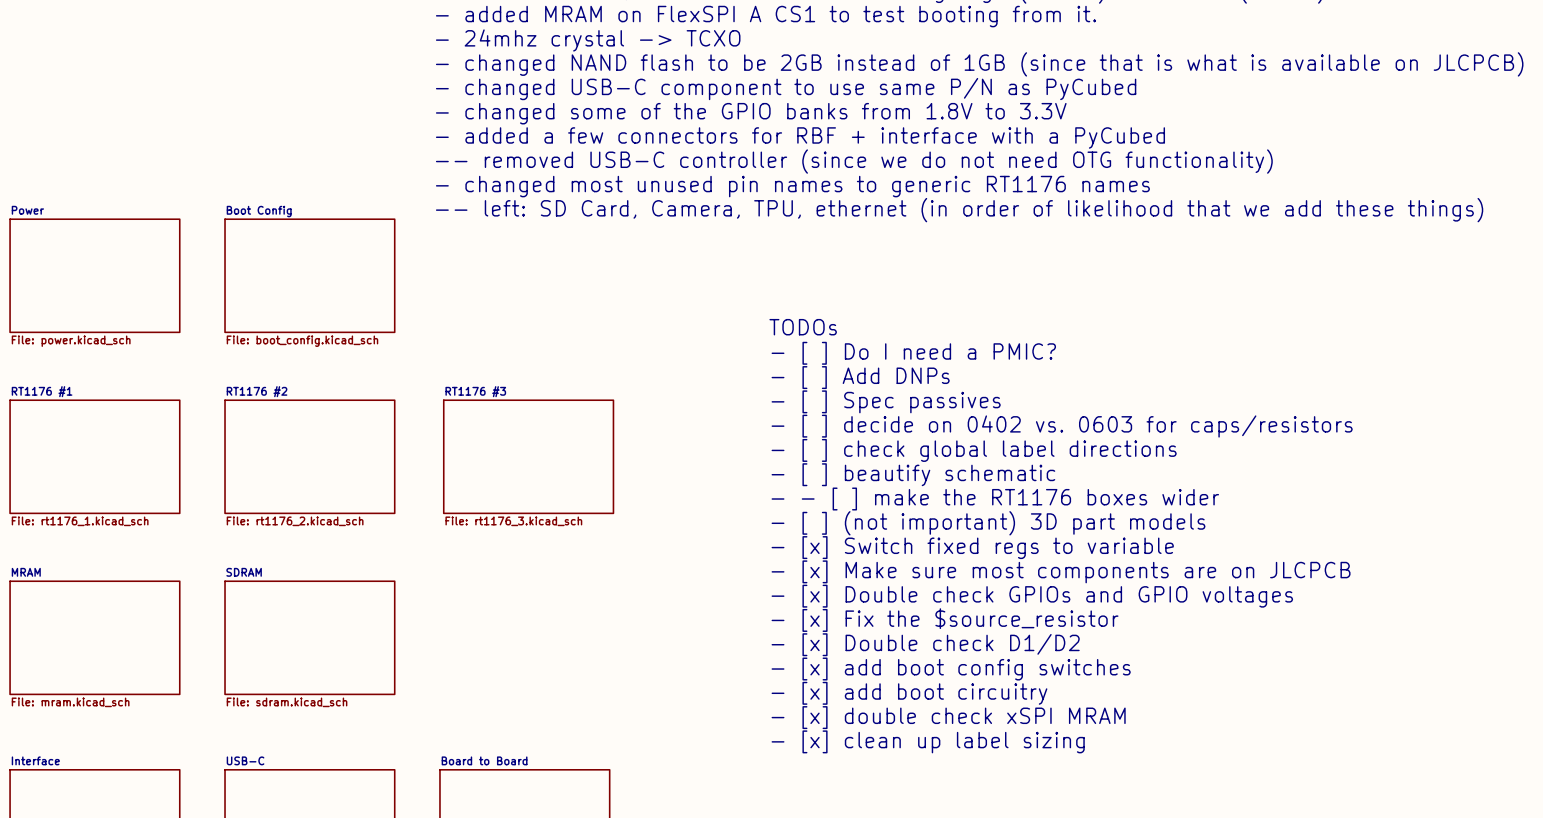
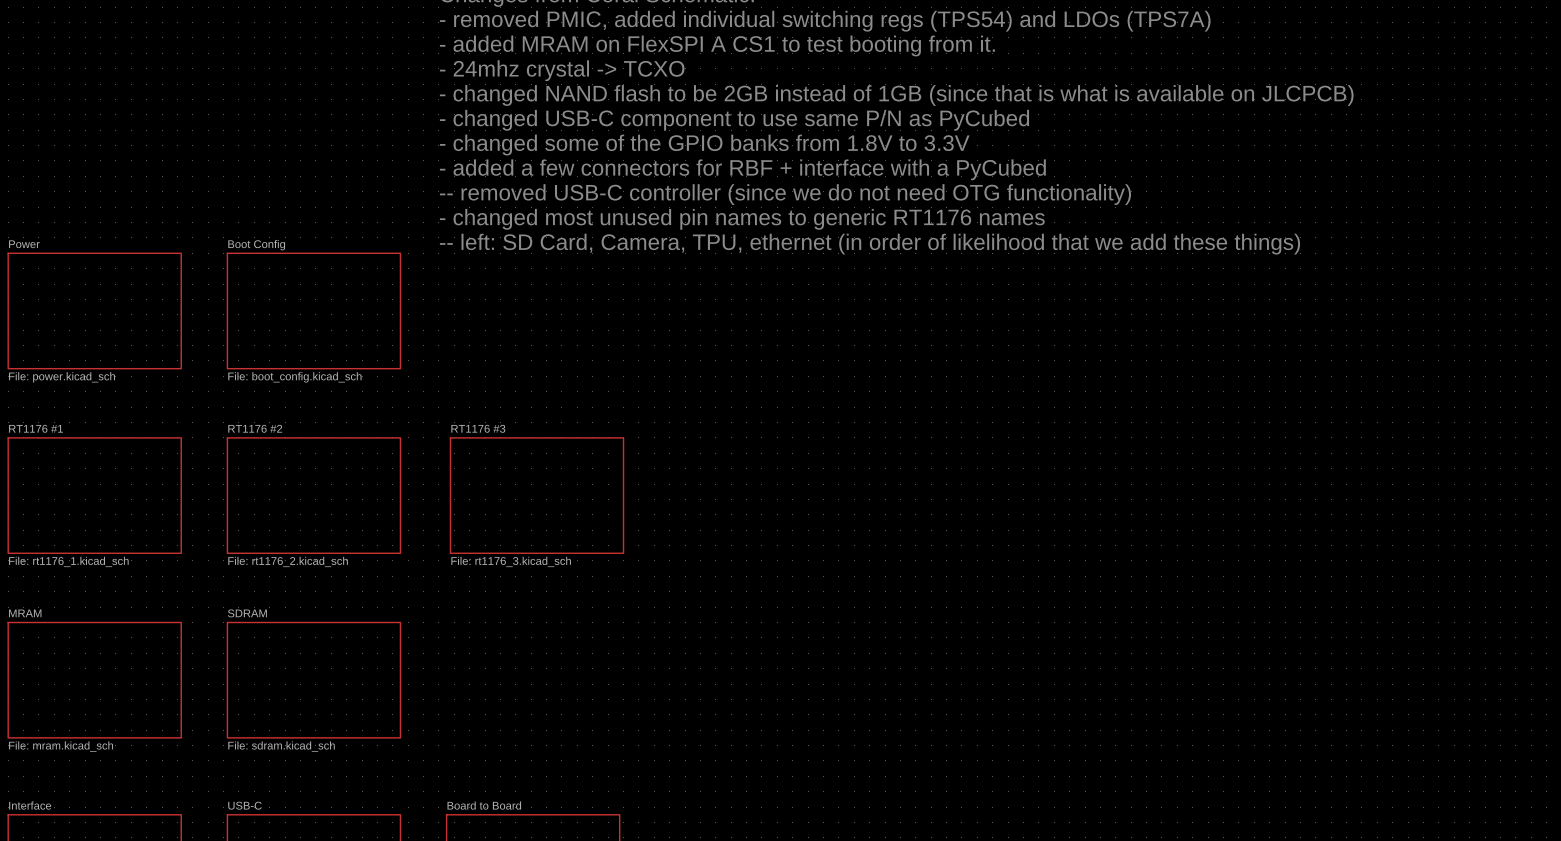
text: TODOs (803, 327) -> none
text: - [ ] Do I need a PMIC? (913, 353) -> none
text: - [ ] Add DNPs (860, 377) -> none
text: - [ ] Spec passives (886, 401) -> none
text: - [ ] decide on 0402 vs. 0603 for caps/resistors (1062, 426) -> none
text: - [ ] check global label directions (974, 450) -> none
text: - [ ] beautify schematic (913, 474) -> none
text: - - [ ] make the RT1176 boxes wider (995, 499) -> none
text: - [ ] (not important) 3D part models (988, 523) -> none
text: - [x] Switch fixed regs to variable (972, 547) -> none
text: - [x] Make sure most components are on JLCPCB (1061, 571) -> none
text: - [x] Double check GPIOs and GPIO voltages (1032, 596) -> none
text: - [x] Fix the $source_resistor (945, 620) -> none
text: - [x] Double check D1/D2 (925, 644) -> none
text: - [x] add boot config switches (951, 669) -> none
text: - [x] add boot circuitry (909, 693) -> none
text: - [x] double check xSPI MRAM (948, 717) -> none
text: - [x] clean up label sizing (928, 741) -> none

